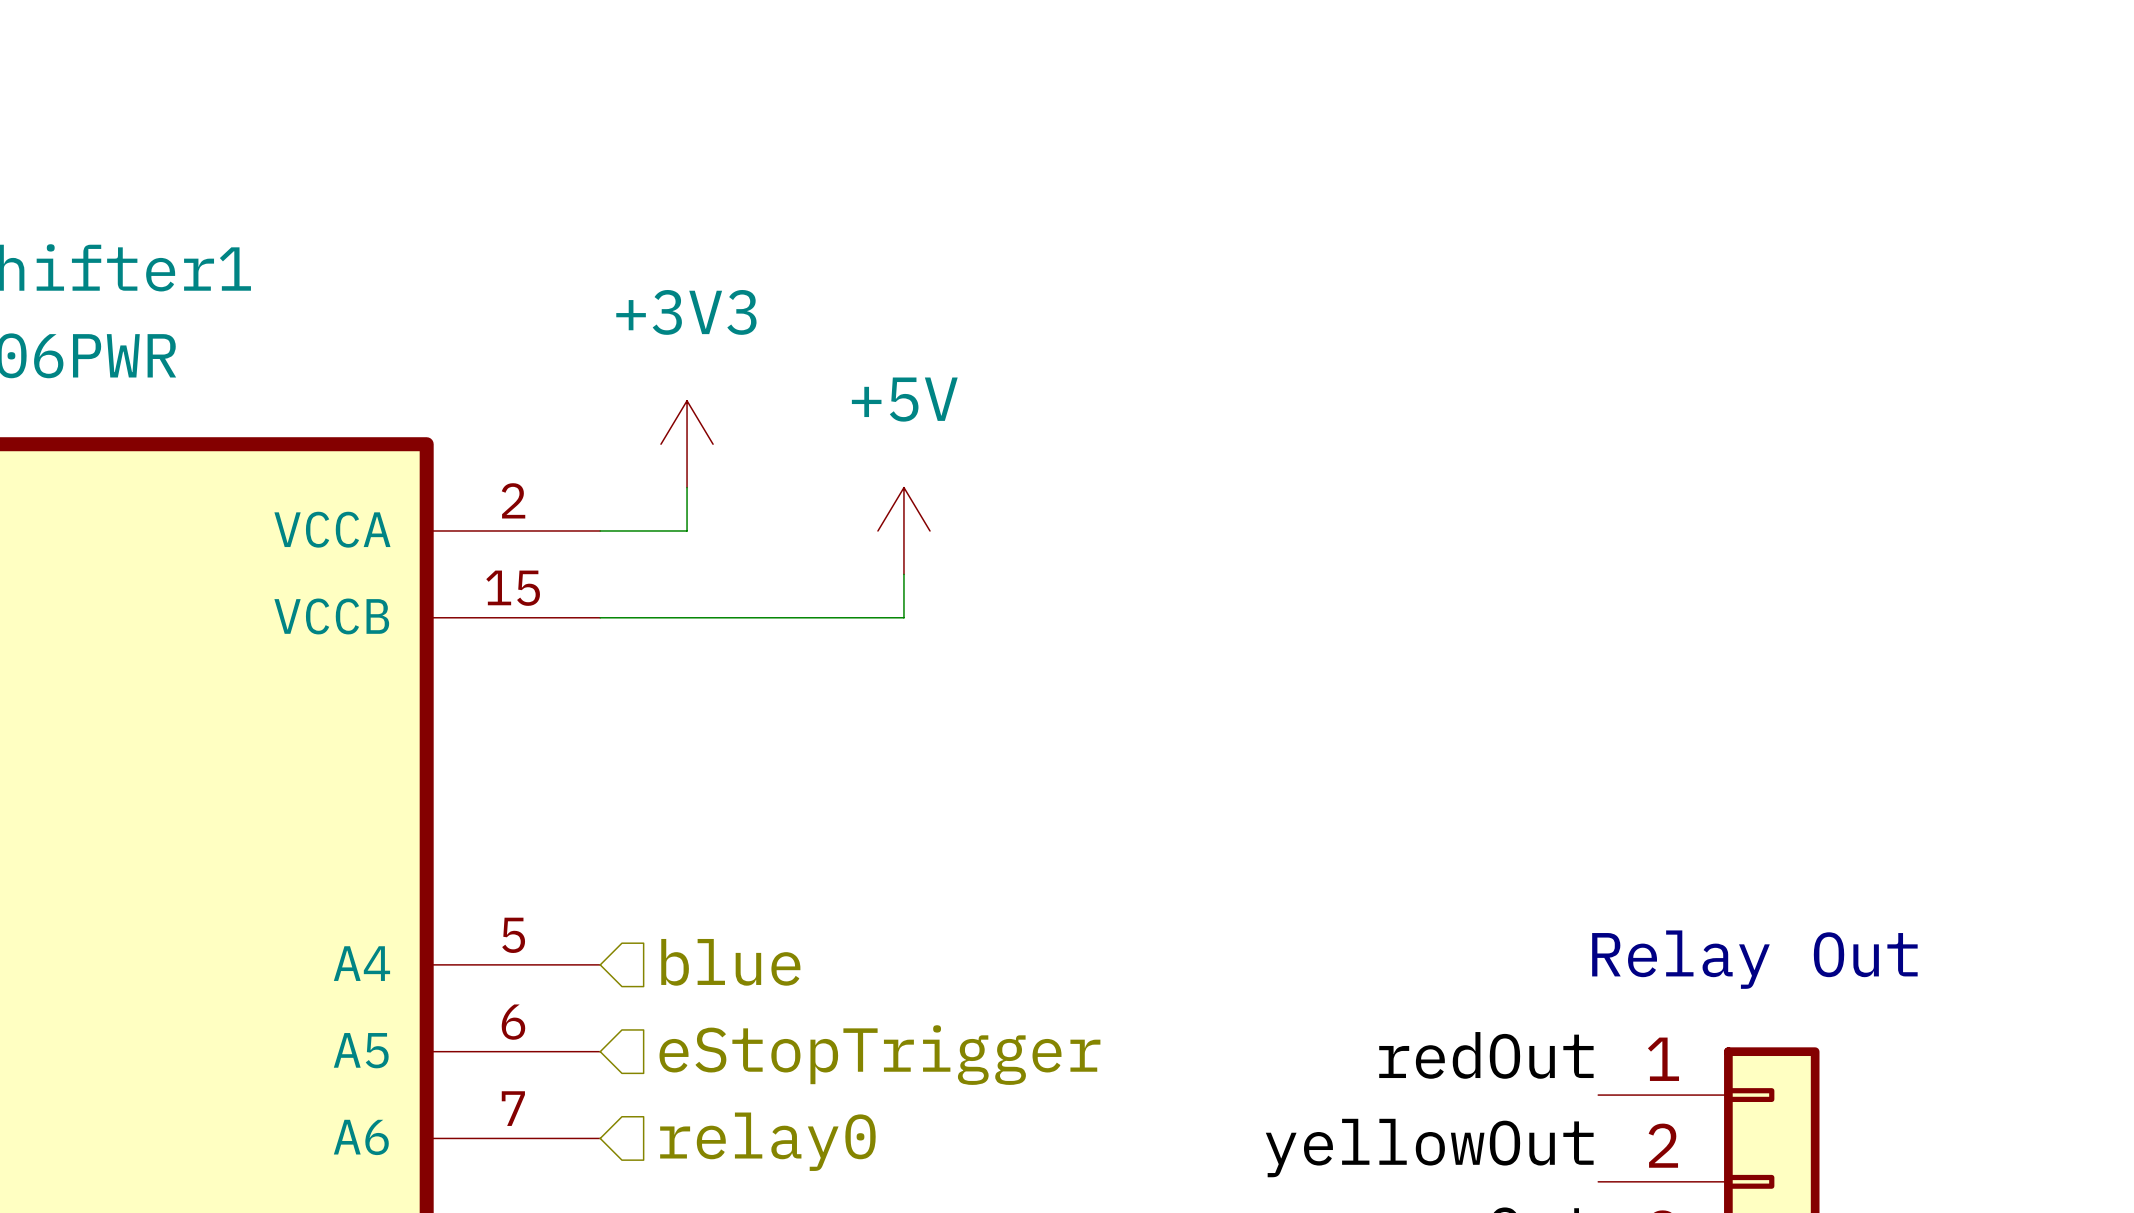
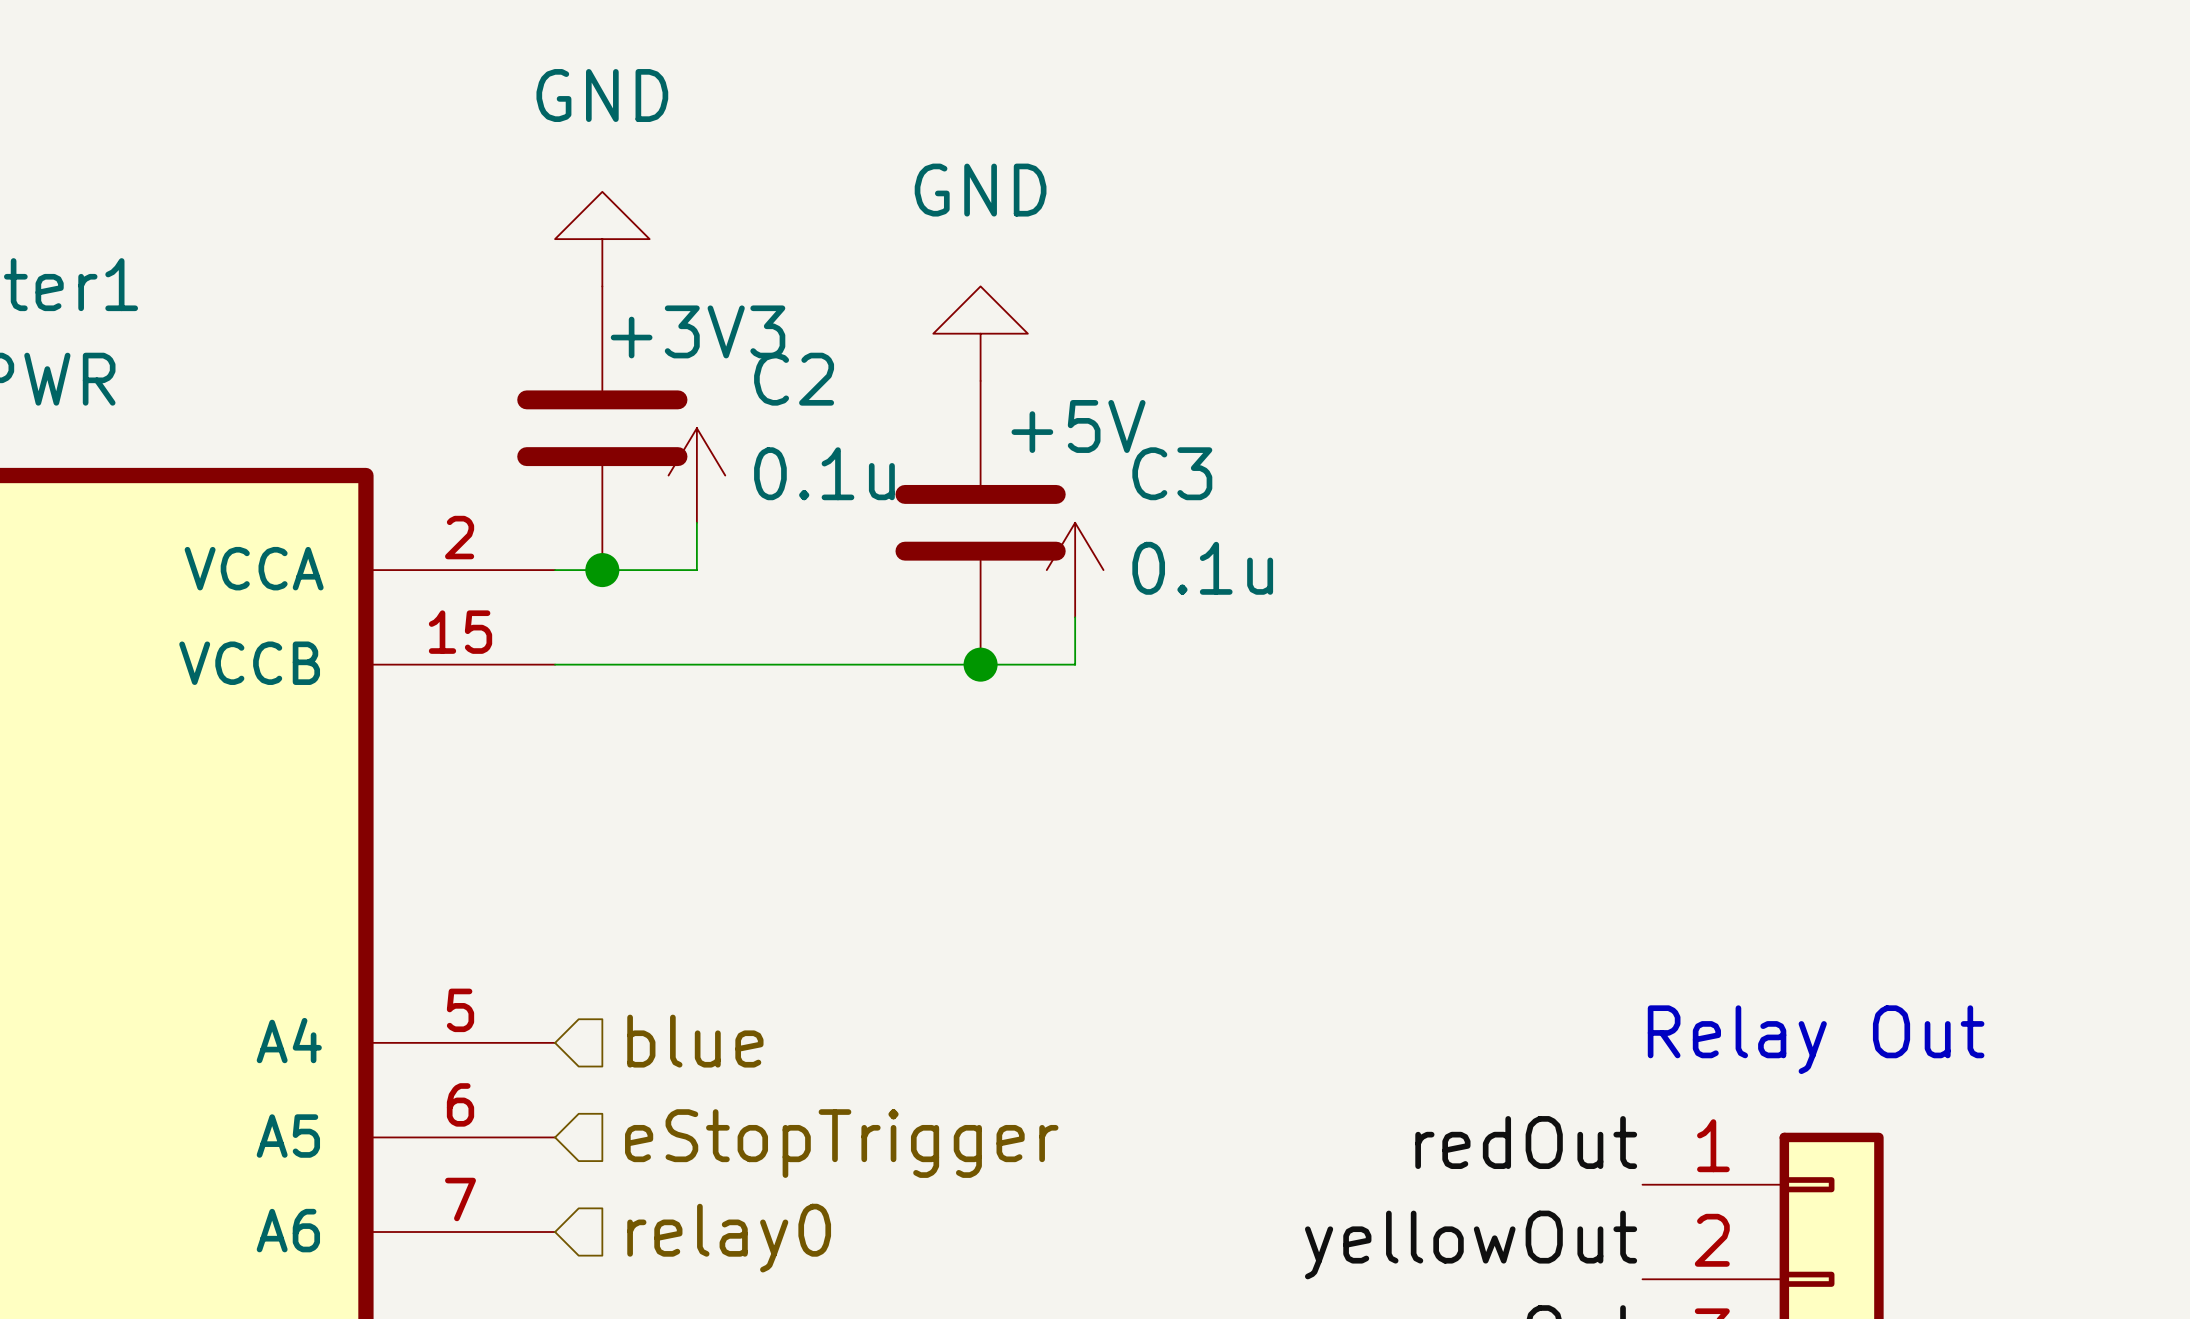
power symbol: none -> GND (602, 239)
power symbol: none -> GND (980, 333)
C2: none -> 0.1u (602, 428)
power symbol position: +3V3 (687, 444) -> +3V3 (696, 475)
wire: (687, 487) (687, 530) -> (696, 522) (696, 570) (649, 570)
C3: none -> 0.1u (980, 522)
junction: none -> (602, 570)
power symbol position: +5V (903, 530) -> +5V (1075, 570)
wire: (903, 574) (903, 617) -> (1075, 617) (1075, 664) (886, 664)
junction: none -> (980, 664)

